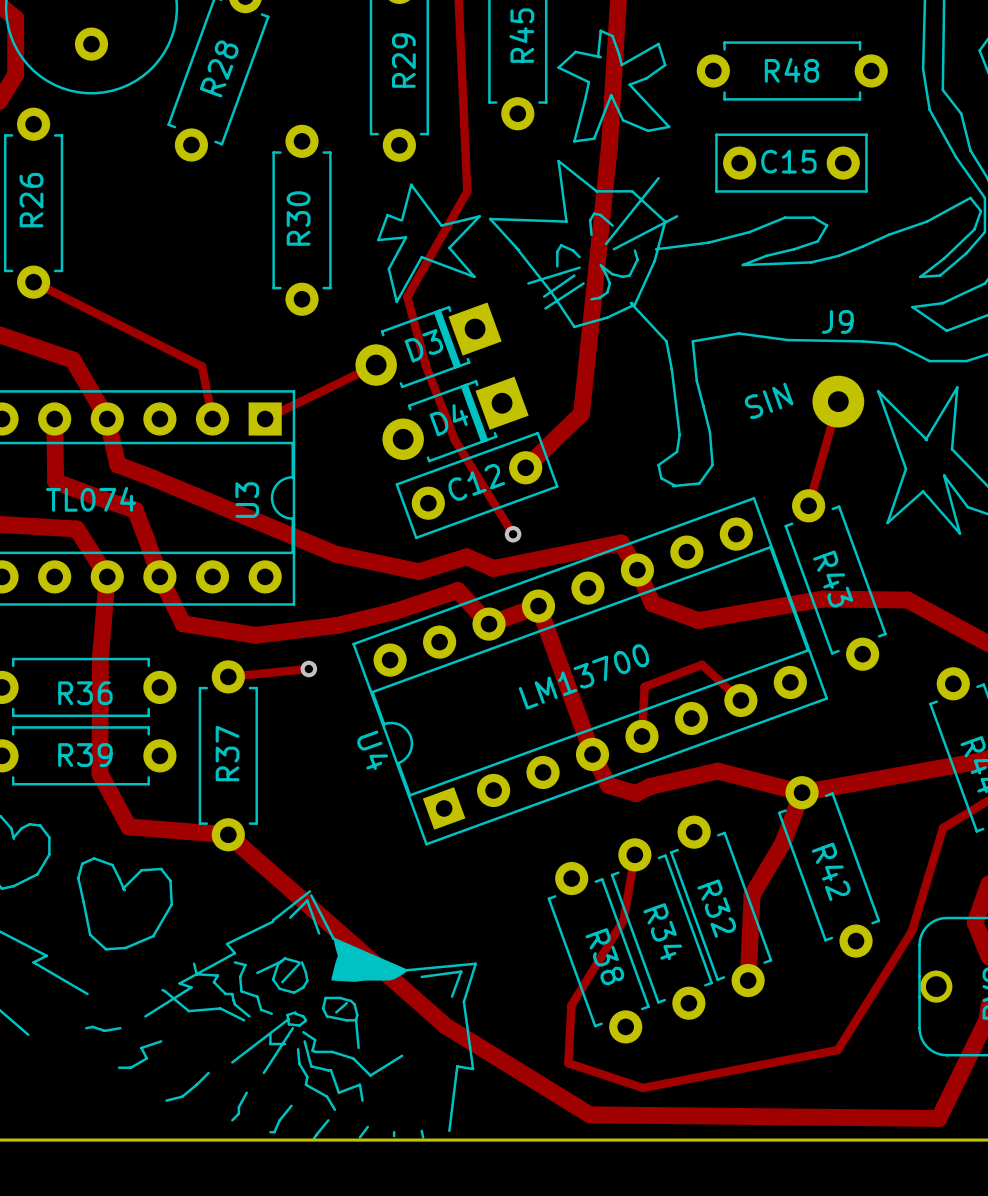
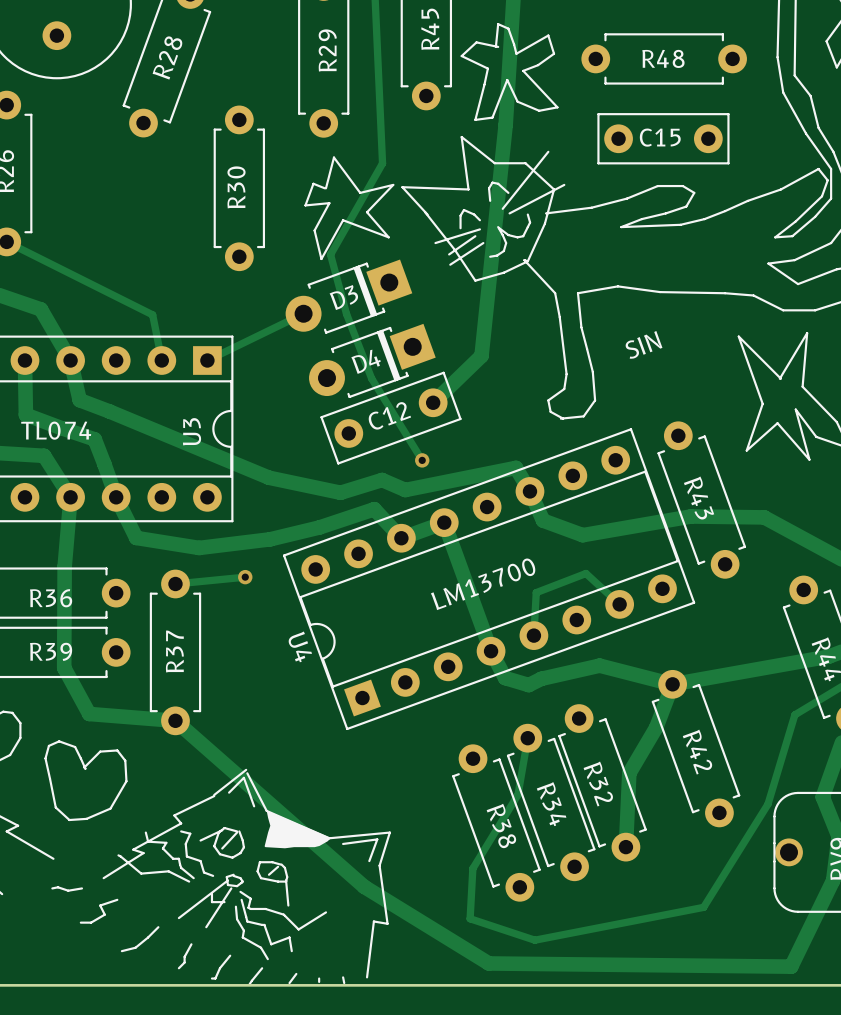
track: (838, 401) (808, 505) -> none
J9: (838, 401) -> none

